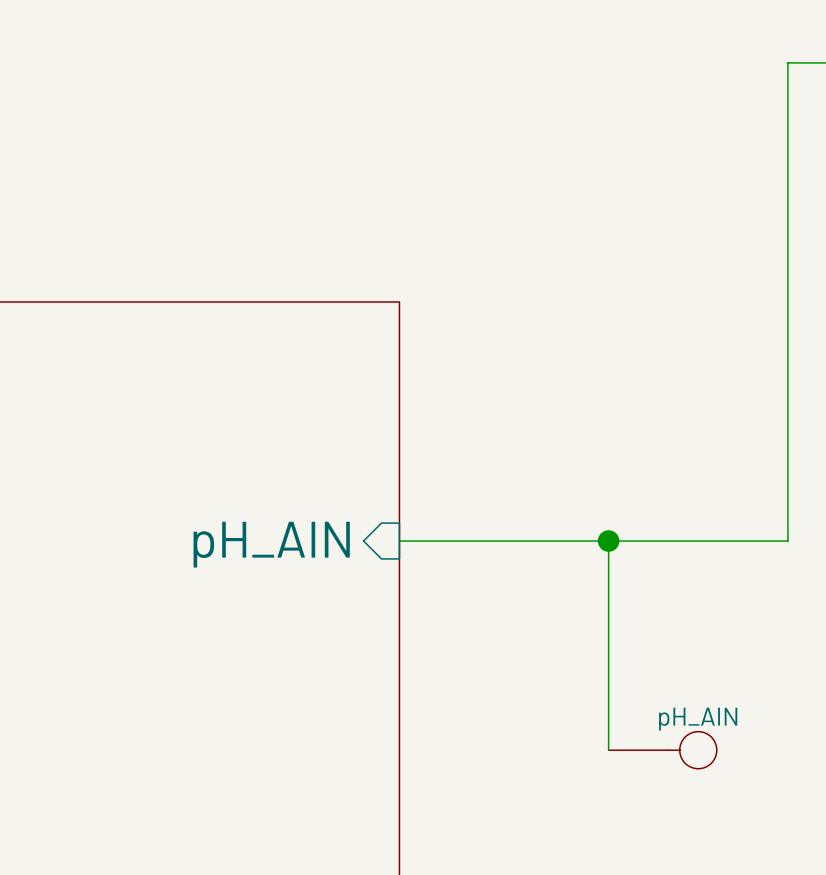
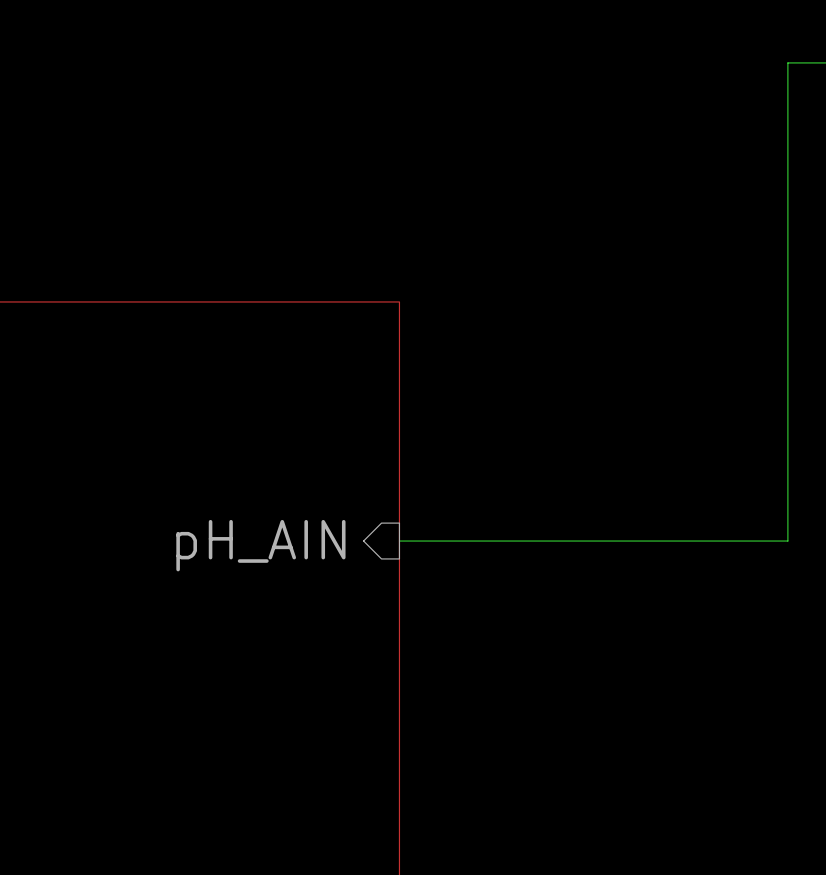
wire: (608, 541) (608, 750) -> none
junction: (608, 541) -> none
part: pH_AIN (662, 750) -> none

